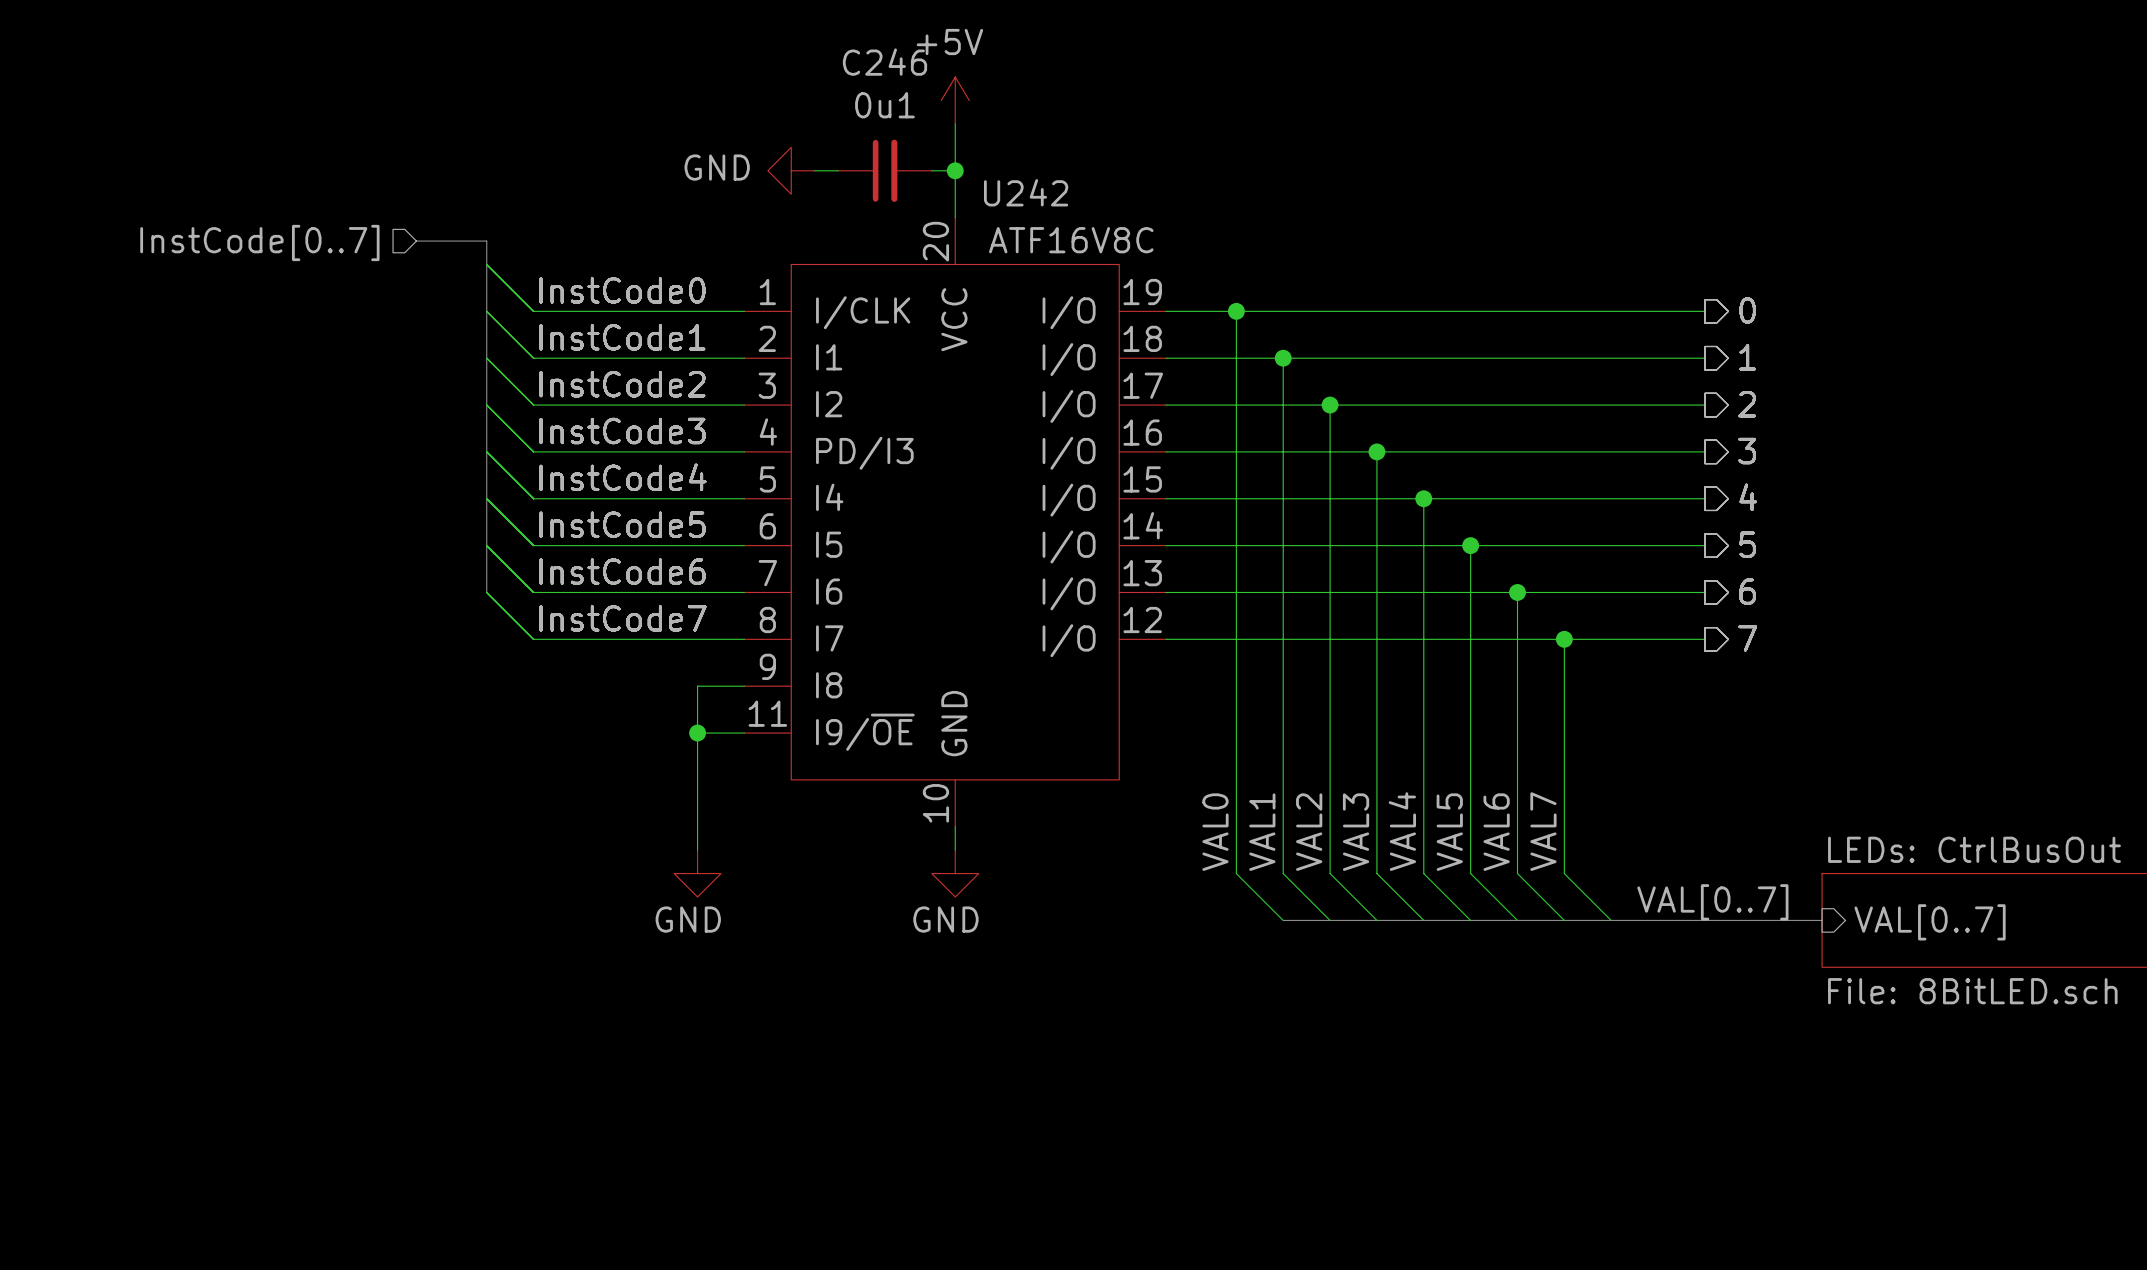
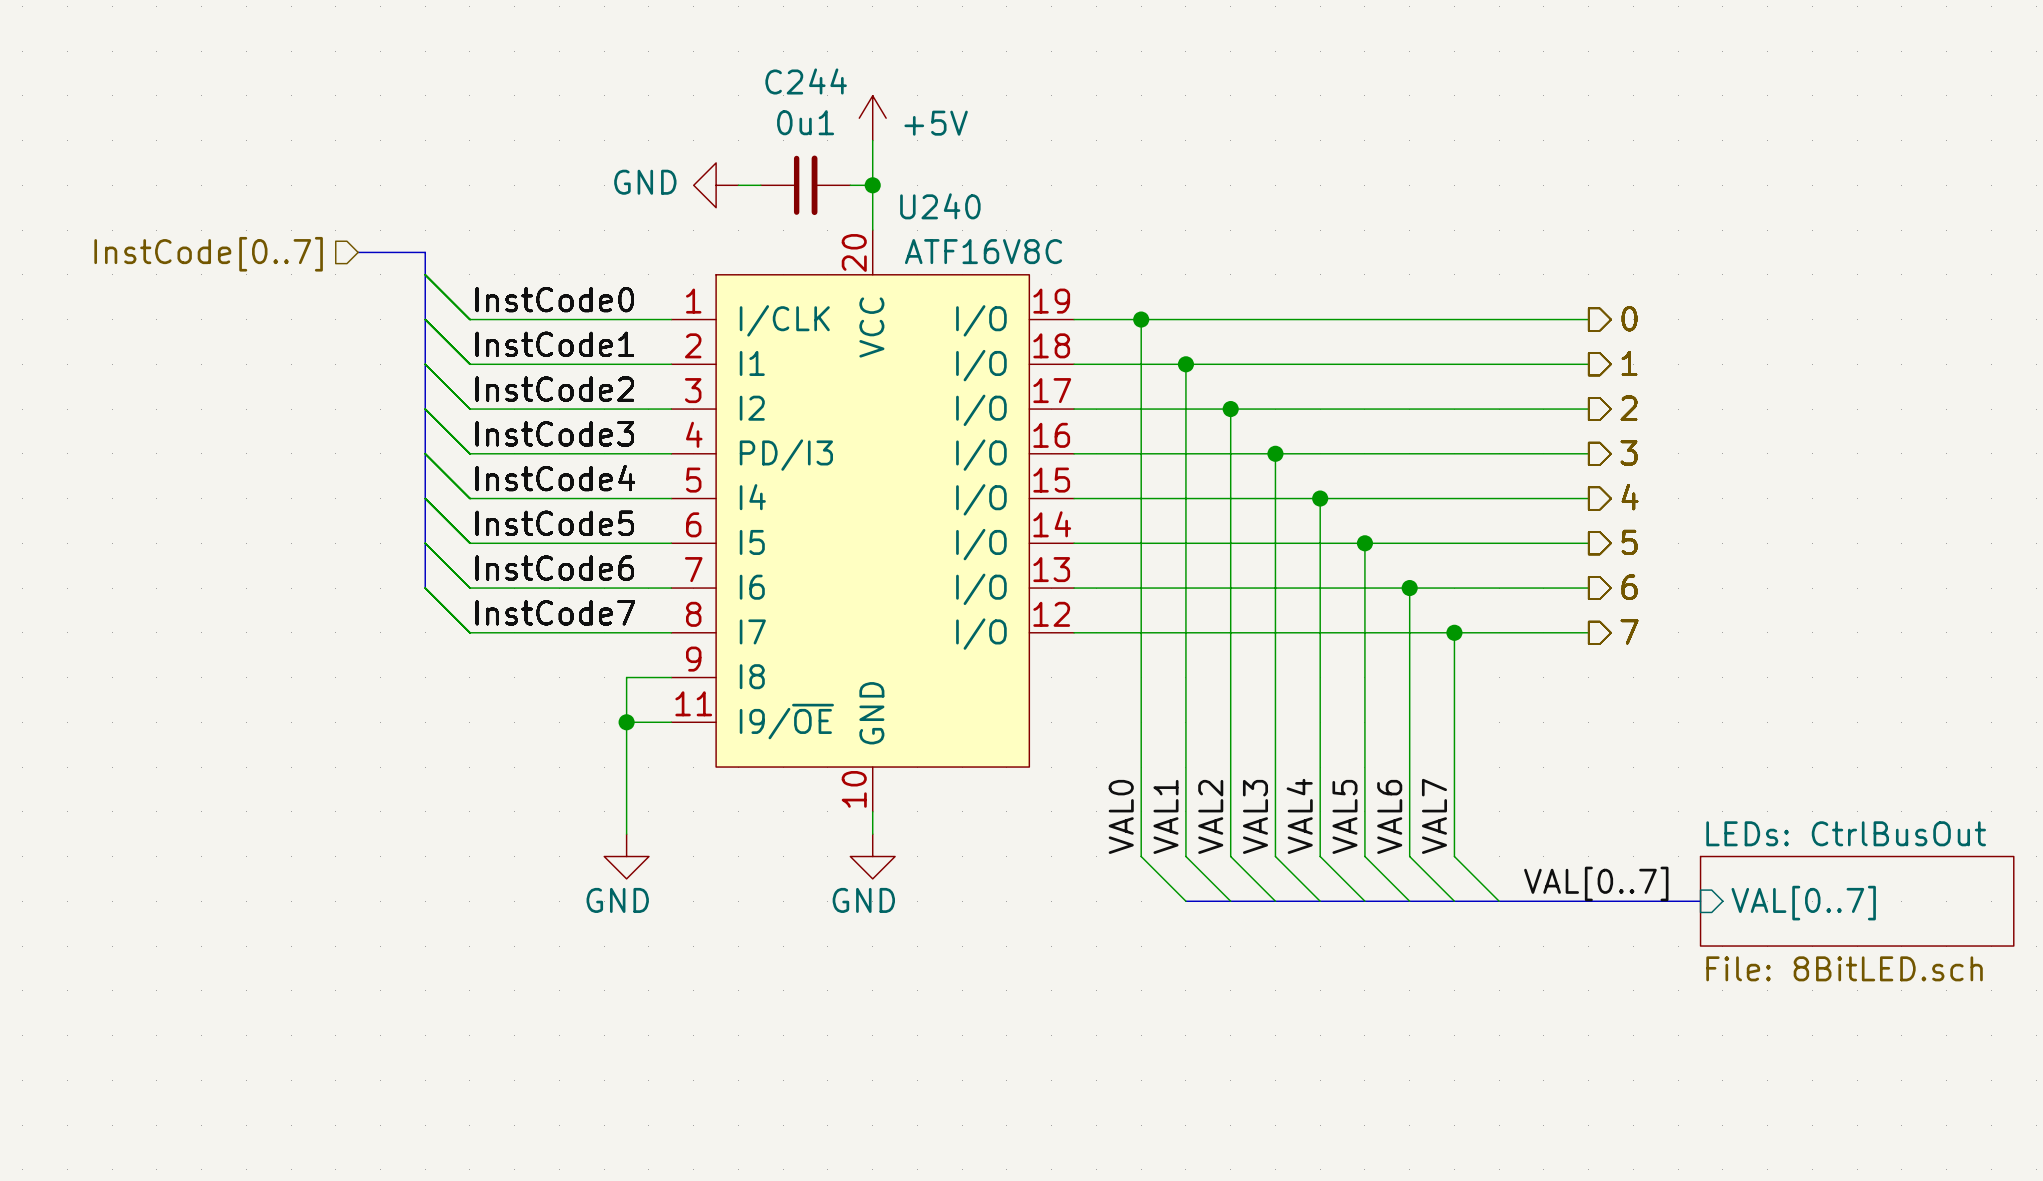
power symbol text position: +5V (949, 42) -> +5V (936, 123)
C246 name: C246 (884, 62) -> C244 (806, 81)
U242 name: U242 (1026, 192) -> U240 (940, 206)

